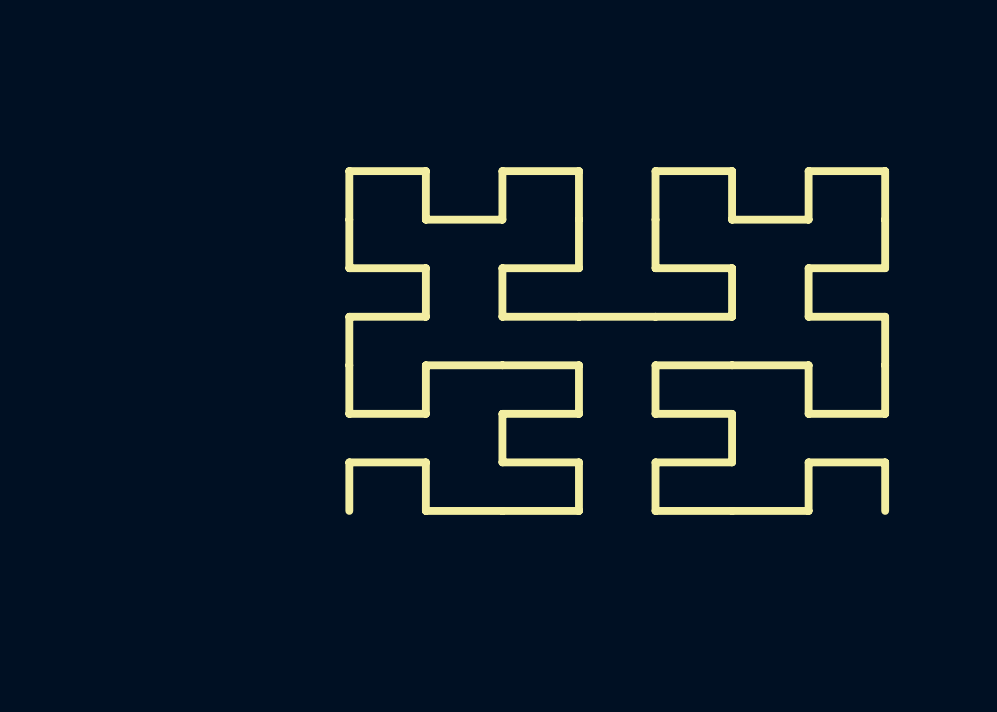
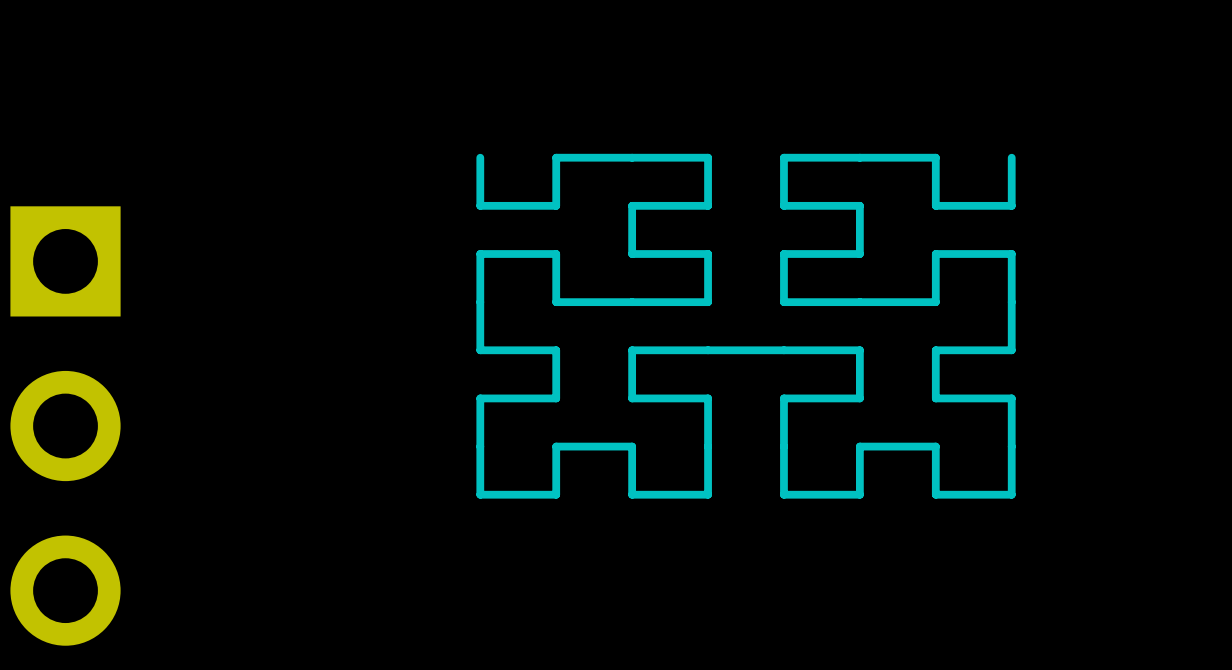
line: (425, 171) (349, 171) -> (556, 494) (480, 494)
line: (502, 171) (502, 219) (425, 219) -> (632, 157) (556, 157)
line: (732, 171) (732, 219) (808, 219) -> (859, 157) (935, 157)
line: (885, 171) (808, 171) -> (1011, 494) (935, 494)
line: (349, 219) (349, 268) -> (480, 205) (556, 205)
line: (578, 219) (578, 268) -> (708, 205) (632, 205) (632, 254)
line: (655, 219) (655, 268) -> (783, 205) (859, 205) (859, 254)
line: (885, 219) (885, 268) -> (1011, 205) (935, 205)
line: (502, 268) (502, 316) -> (556, 302) (632, 302)
line: (732, 268) (732, 316) -> (935, 302) (859, 302)
line: (425, 316) (349, 316) -> (480, 254) (480, 302)
line: (655, 316) (578, 316) -> (783, 302) (783, 254)
line: (885, 316) (808, 316) -> (1011, 302) (1011, 254)
line: (349, 365) (349, 413) -> (480, 350) (556, 350)
line: (502, 365) (425, 365) -> (632, 350) (632, 398)
line: (578, 365) (578, 413) -> (708, 254) (708, 302)
line: (655, 365) (655, 413) -> (783, 350) (708, 350)
line: (808, 365) (732, 365) -> (859, 398) (859, 350)
line: (885, 365) (885, 413) -> (1011, 350) (935, 350)
line: (502, 413) (502, 462) (578, 462) -> (708, 398) (708, 446)
line: (732, 413) (732, 462) (655, 462) -> (783, 398) (783, 446)
line: (425, 462) (349, 462) -> (480, 398) (480, 446)
line: (885, 462) (808, 462) -> (1011, 446) (1011, 398)
line: (502, 510) (425, 510) -> (632, 494) (632, 446) (556, 446)
line: (808, 510) (732, 510) -> (935, 446) (859, 446) (859, 494)

